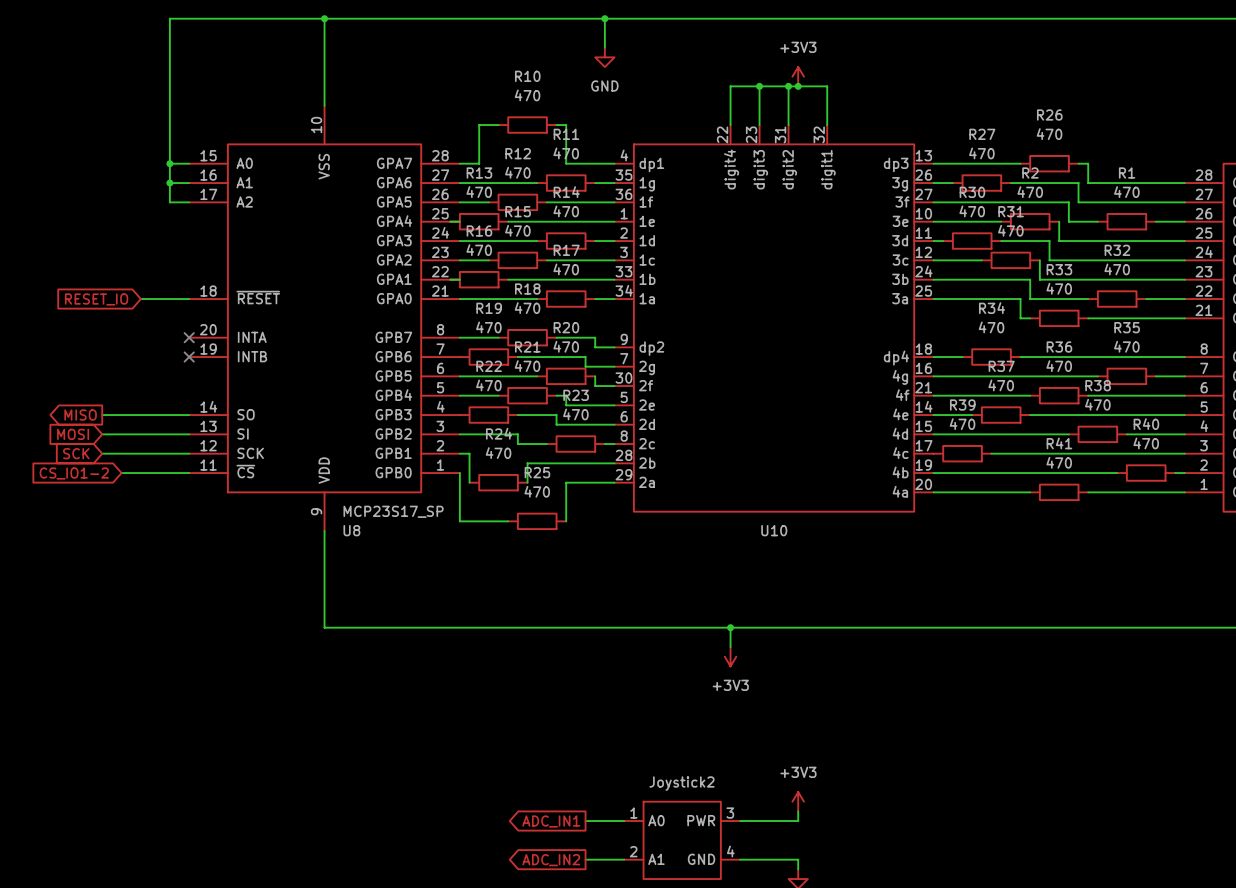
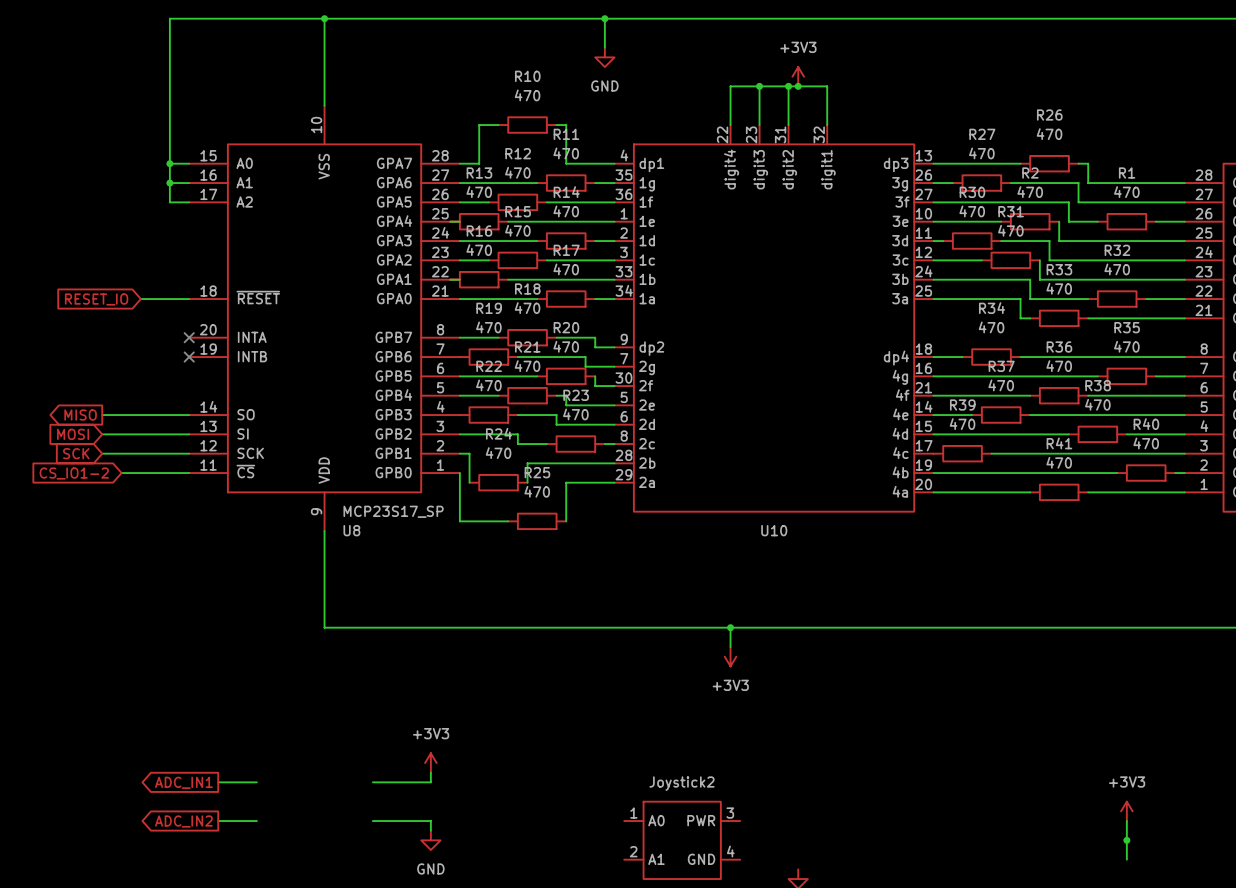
power symbol: none -> +3V3 (430, 763)
wire: none -> (430, 772) (430, 782) (372, 782)
global label: none -> ADC_IN1 (183, 782)
wire: none -> (218, 782) (256, 782)
power symbol: +3V3 (798, 801) -> none
wire: (798, 811) (798, 821) (740, 821) -> none
power symbol: none -> +3V3 (1126, 811)
global label: none -> ADC_IN2 (183, 821)
wire: none -> (218, 821) (256, 821)
wire: none -> (372, 821) (430, 821) (430, 830)
global label: ADC_IN1 (551, 821) -> none
wire: (585, 821) (624, 821) -> none
wire: none -> (1126, 821) (1126, 859)
power symbol: none -> GND (430, 840)
junction: none -> (1126, 840)
wire: (585, 859) (624, 859) -> none
wire: (740, 859) (798, 859) (798, 869) -> none
global label: ADC_IN2 (551, 860) -> none

